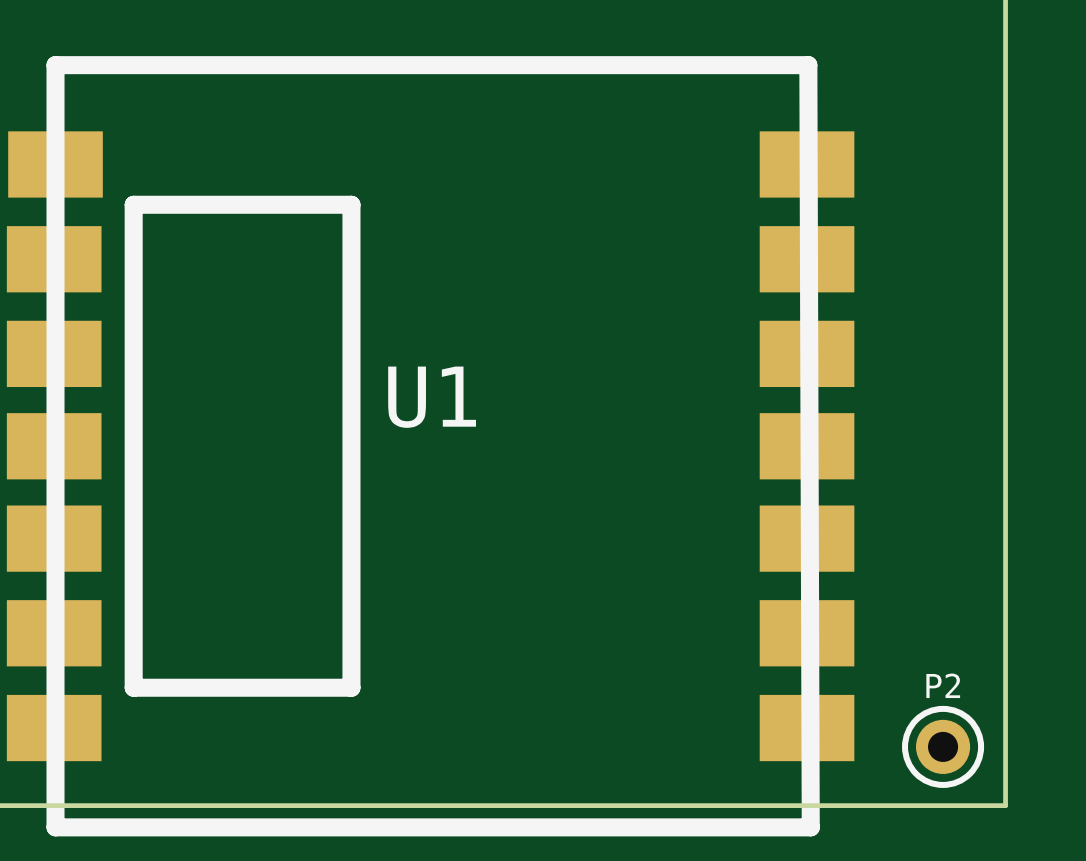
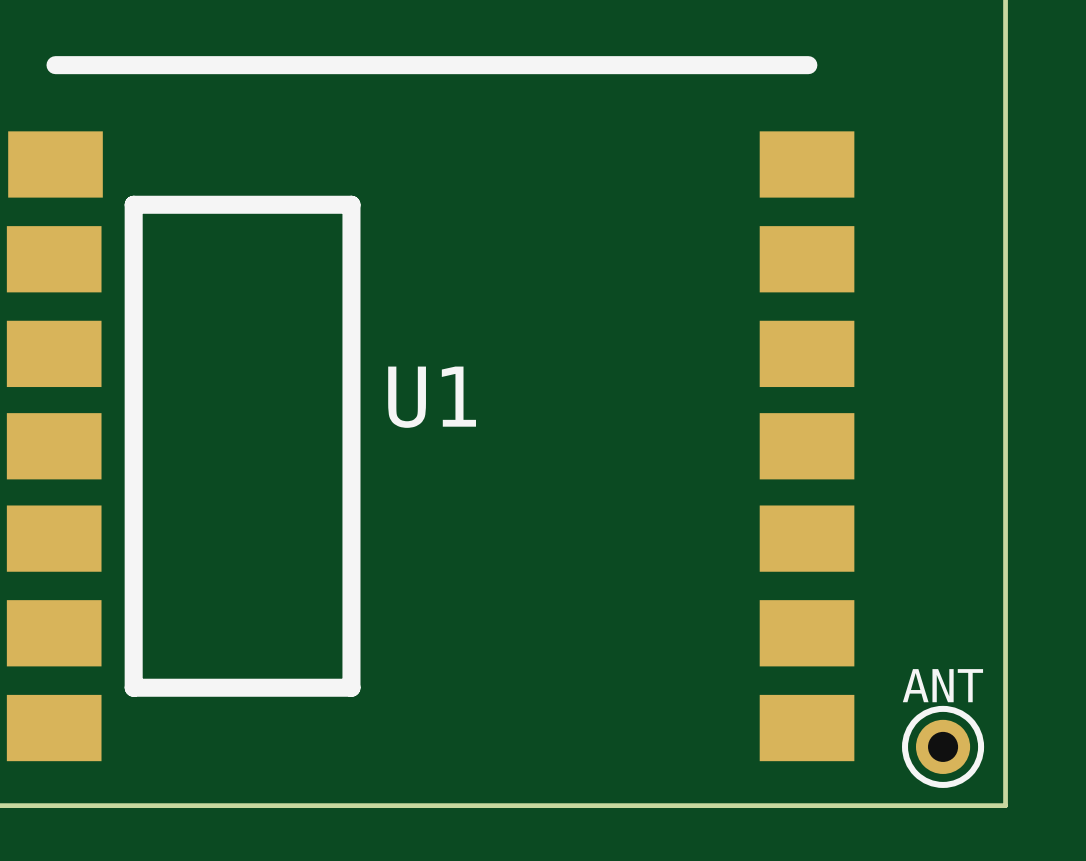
U1 footprint: [6, 56, 855, 837] -> [6, 56, 855, 762]
P2 name: P2 (943, 685) -> ANT (942, 685)

